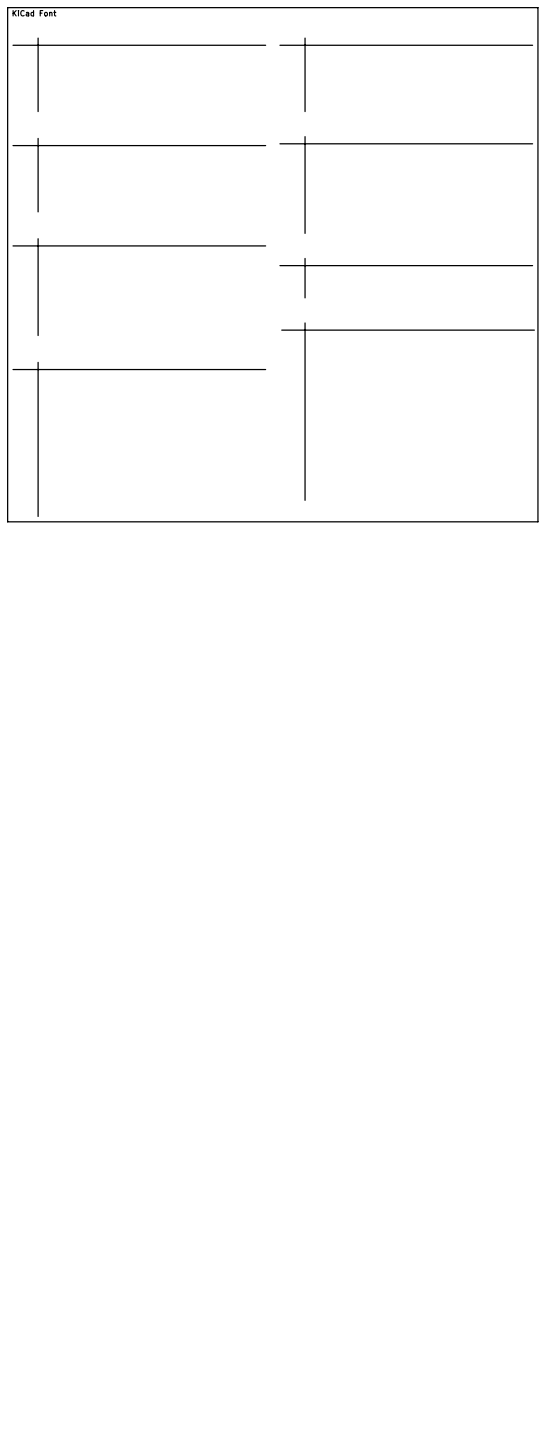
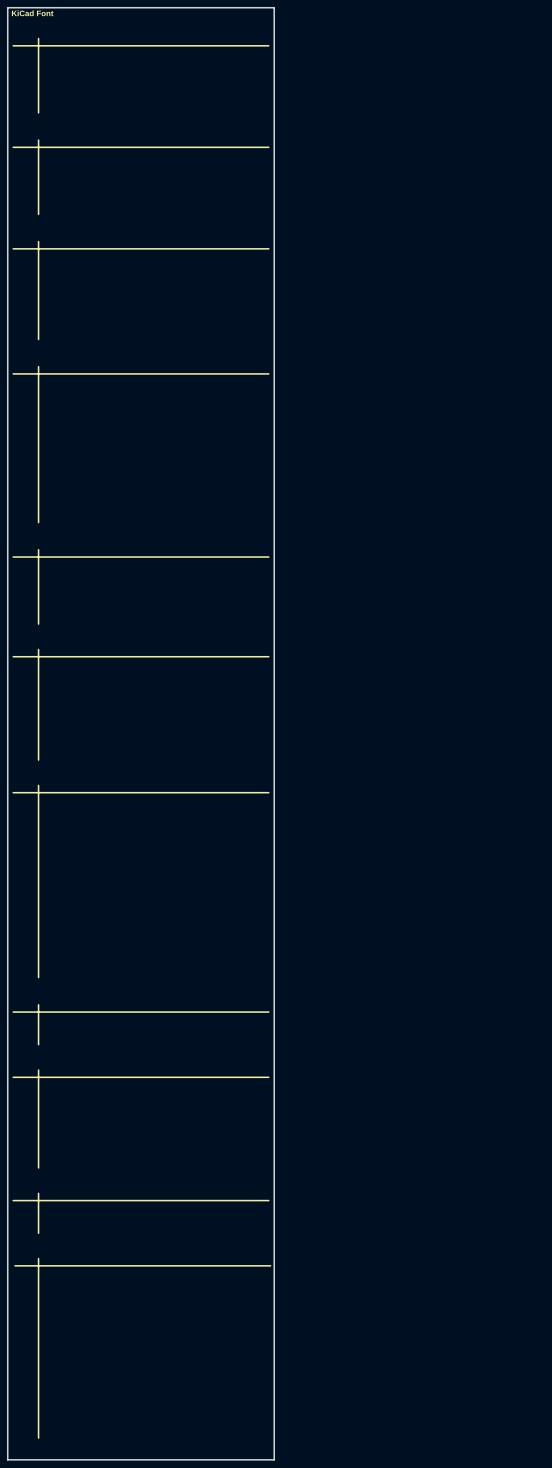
board edge: (271, 7) (537, 7) (537, 521) (7, 521) -> (274, 7) (274, 1459) (7, 1459) (7, 528)
line: (305, 38) (305, 111) -> none
line: (279, 45) (532, 45) -> none
line: (305, 136) (305, 233) -> none
line: (279, 143) (532, 143) -> none
line: (305, 258) (305, 297) -> none
line: (279, 265) (532, 265) -> none
line: (305, 322) (305, 500) -> none
line: (281, 330) (534, 330) -> none
line: none -> (38, 549) (38, 624)
line: none -> (13, 557) (268, 557)
line: none -> (38, 649) (38, 760)
line: none -> (13, 656) (268, 656)
line: none -> (38, 785) (38, 977)
line: none -> (13, 792) (268, 792)
line: none -> (38, 1004) (38, 1044)
line: none -> (13, 1012) (268, 1012)
line: none -> (38, 1070) (38, 1167)
line: none -> (13, 1077) (268, 1077)
line: none -> (38, 1193) (38, 1233)
line: none -> (13, 1200) (268, 1200)
line: none -> (38, 1258) (38, 1438)
line: none -> (14, 1265) (270, 1265)

